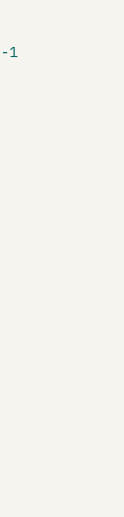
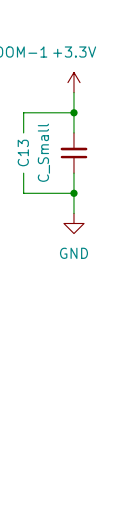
power symbol: none -> +3.3V (73, 82)
wire: none -> (73, 92) (73, 132)
wire: none -> (73, 112) (23, 112) (23, 132)
junction: none -> (73, 112)
C13: none -> C_Small (73, 153)
wire: none -> (23, 173) (23, 193) (73, 193)
wire: none -> (73, 173) (73, 213)
junction: none -> (73, 193)
power symbol: none -> GND (73, 223)

